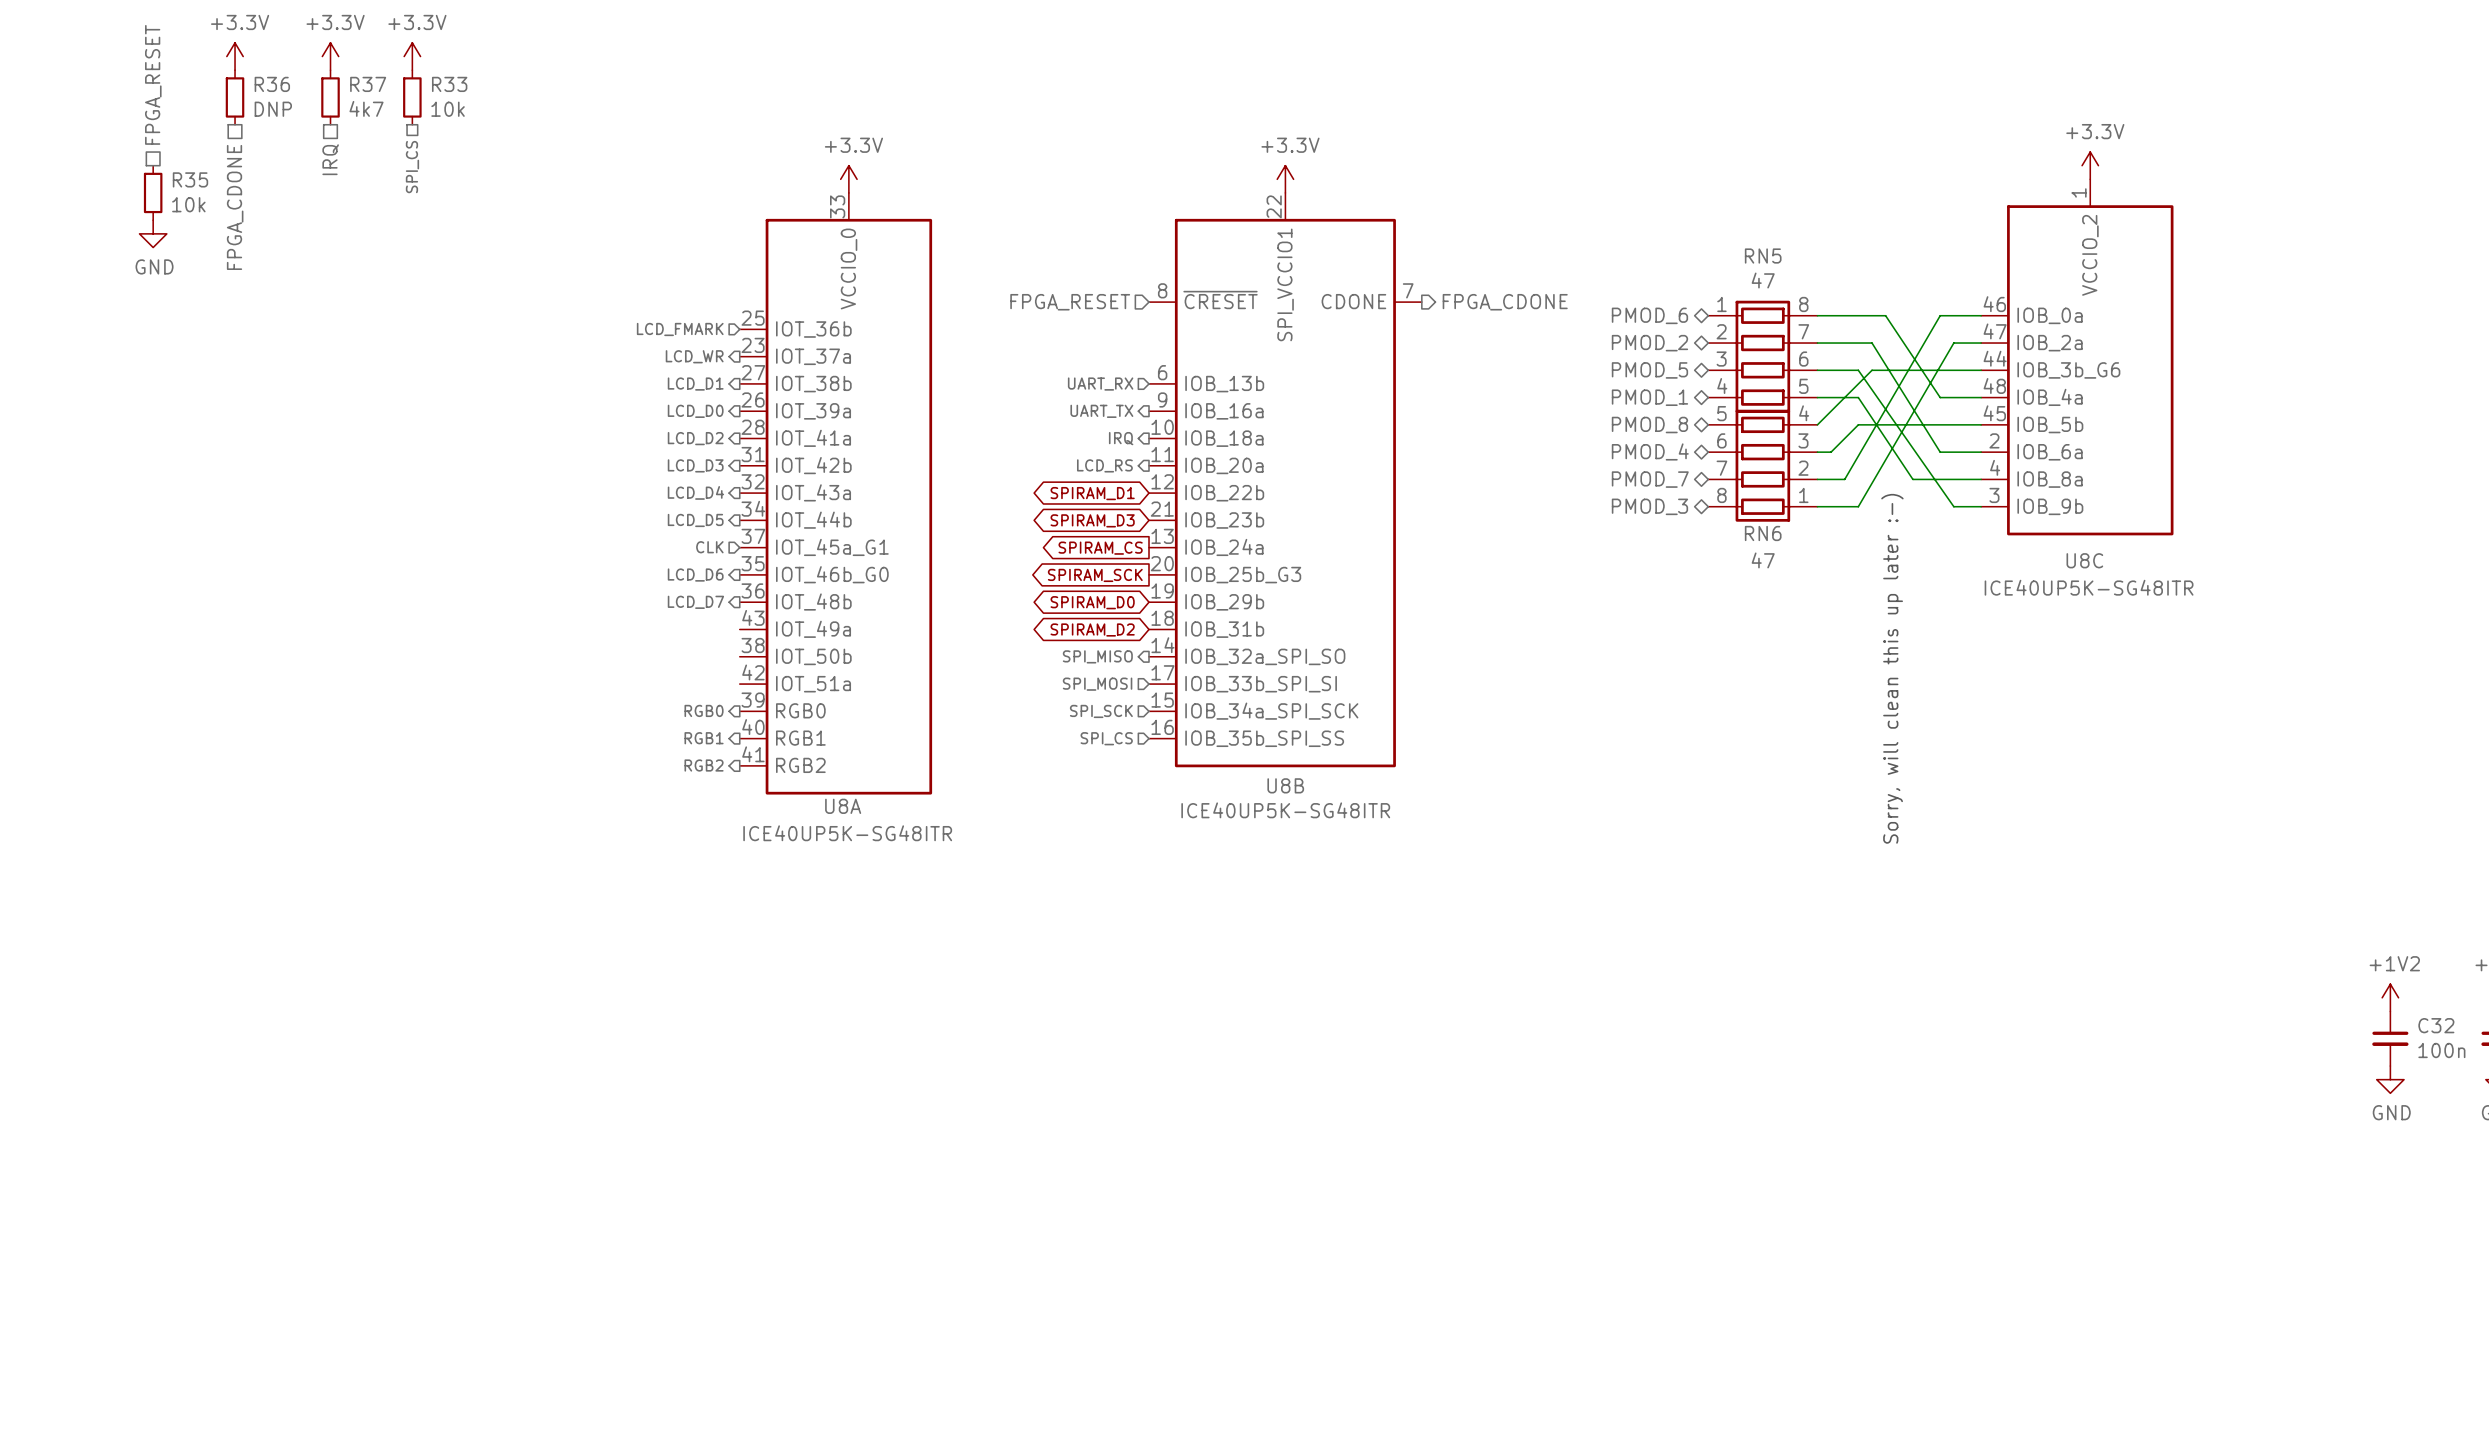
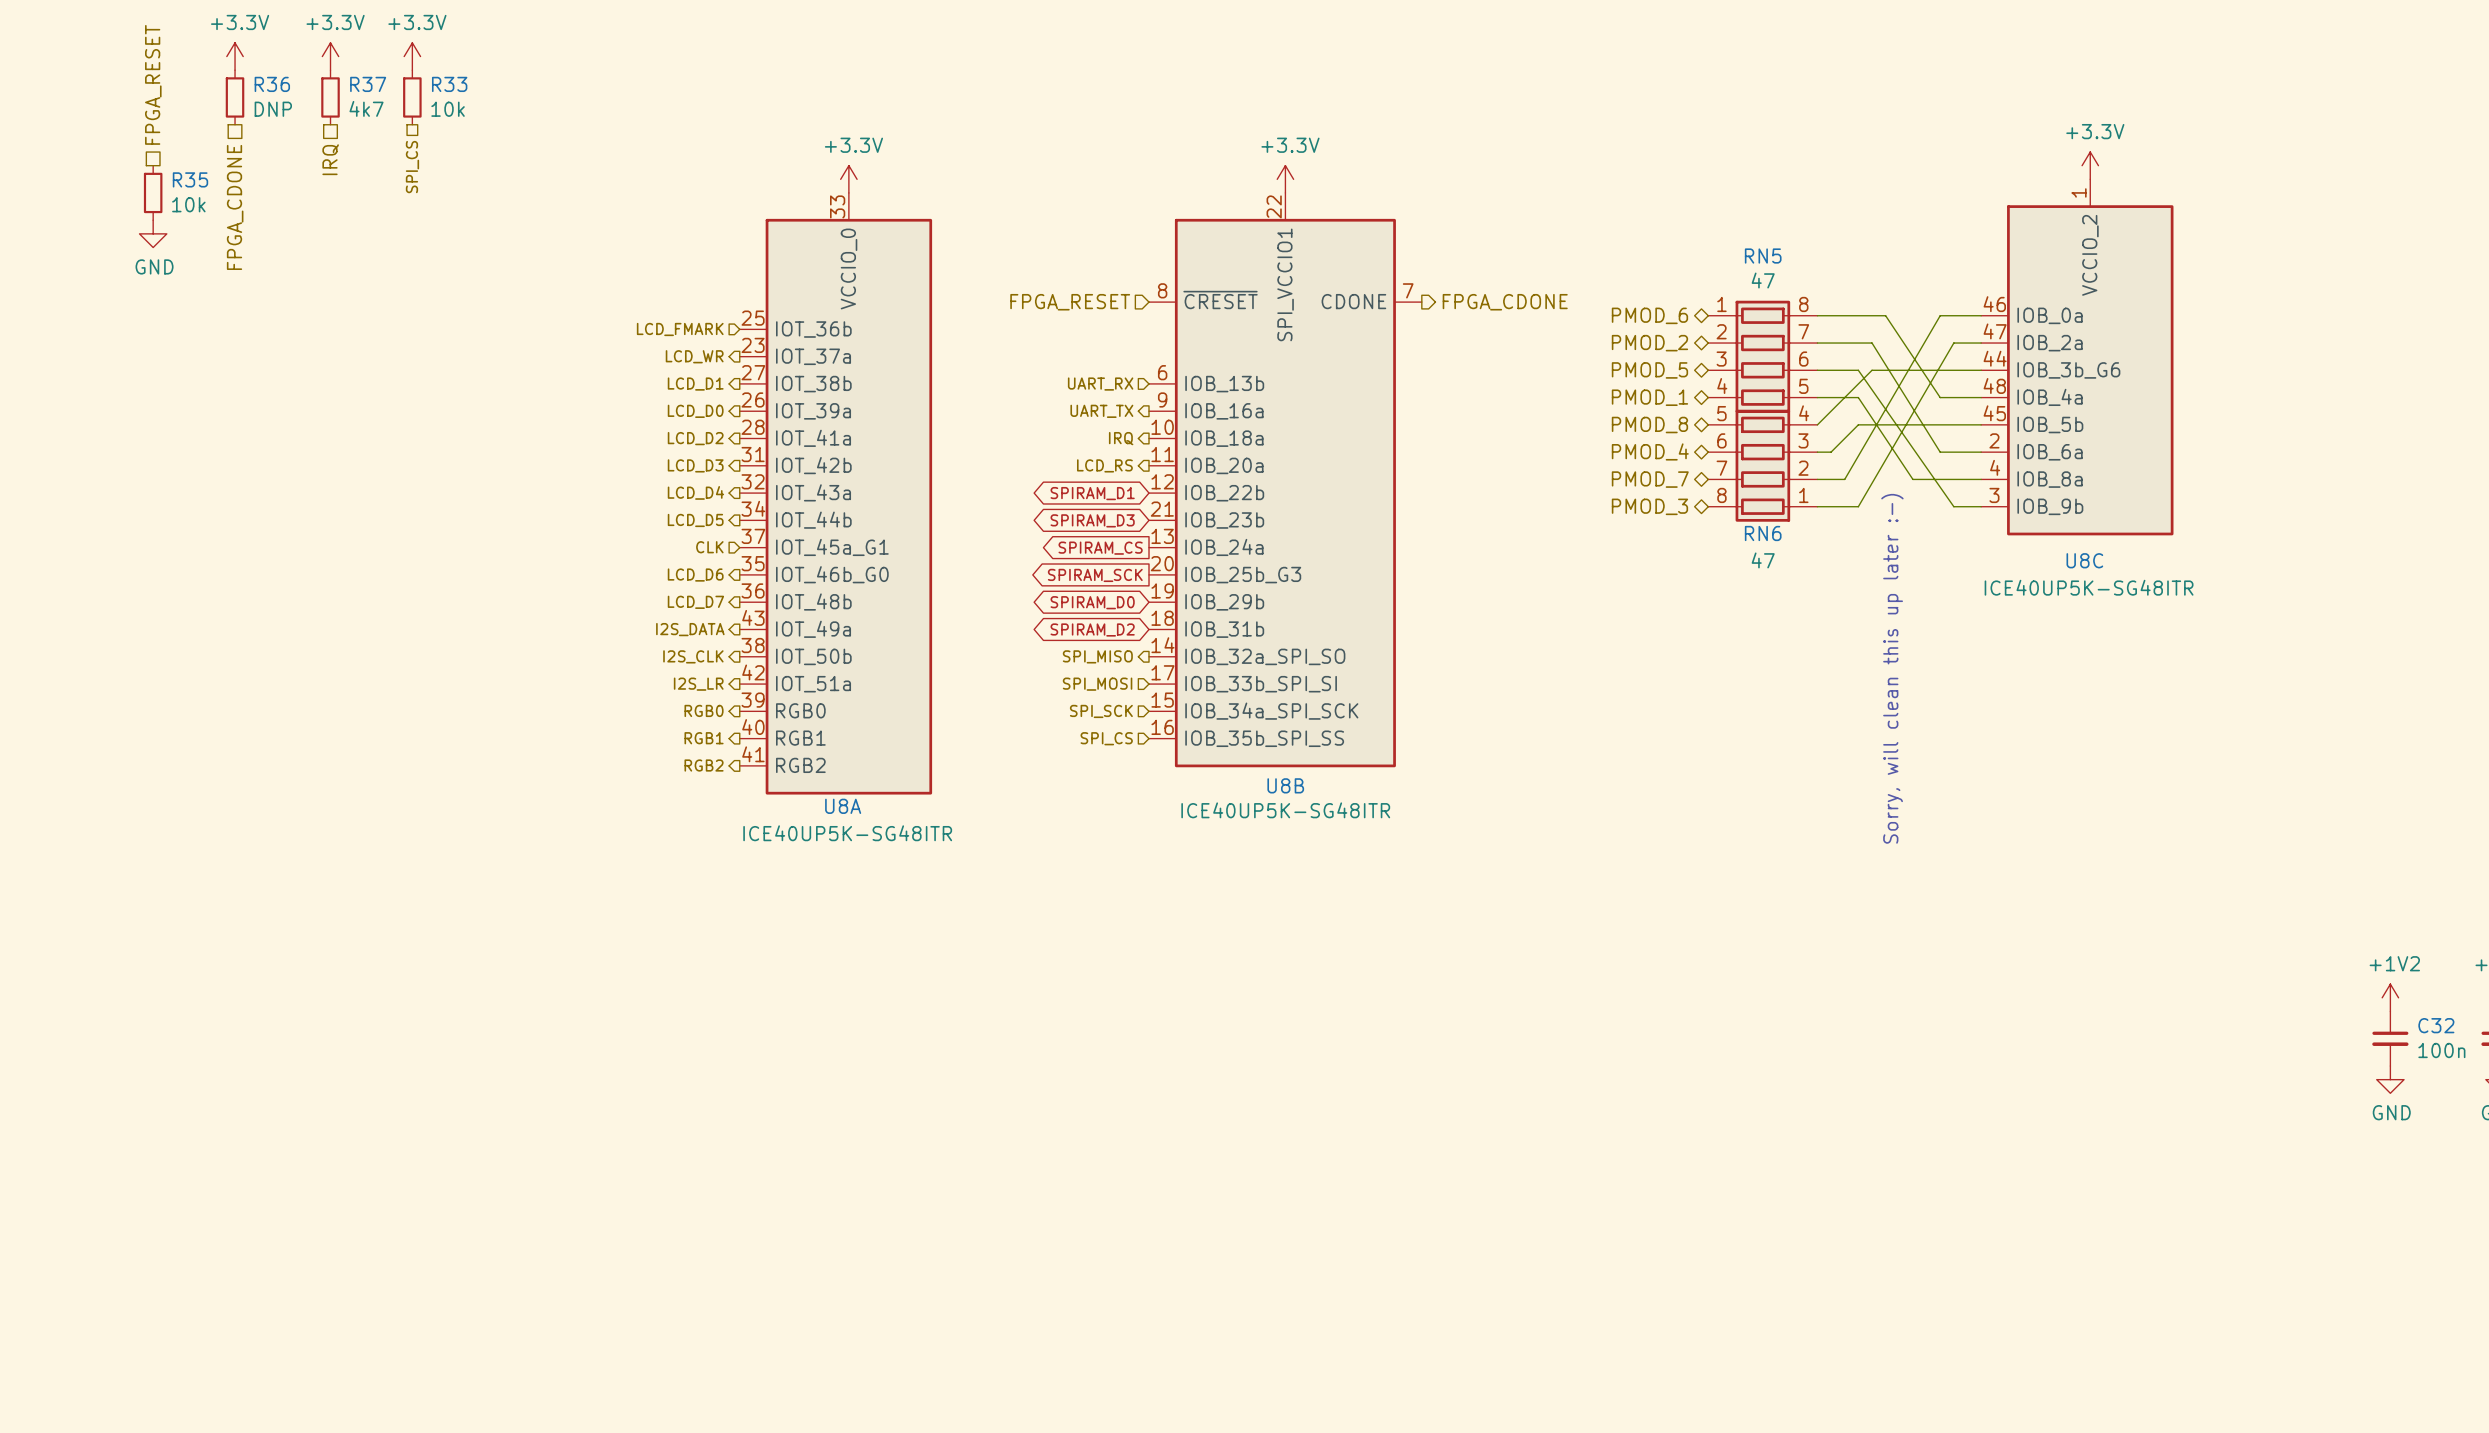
hierarchical label: none -> I2S_DATA (690, 629)
hierarchical label: none -> I2S_CLK (693, 656)
hierarchical label: none -> I2S_LR (698, 684)

